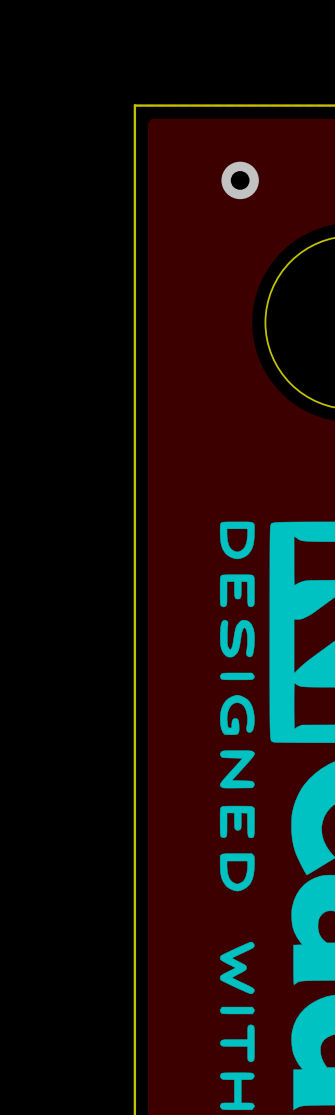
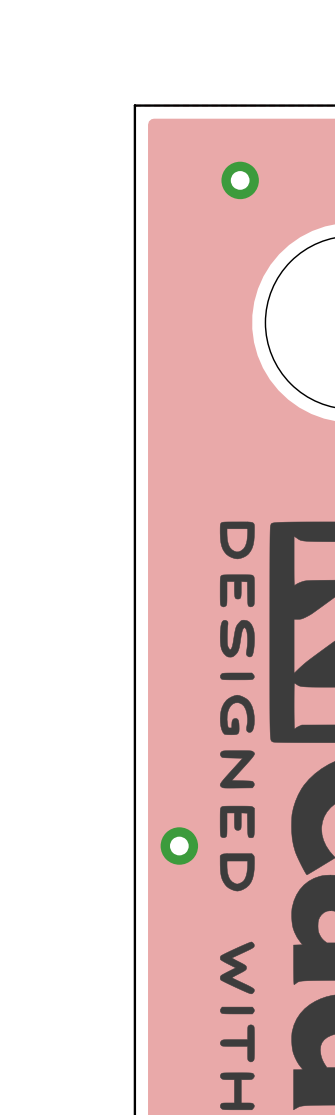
via: none -> (179, 846)

